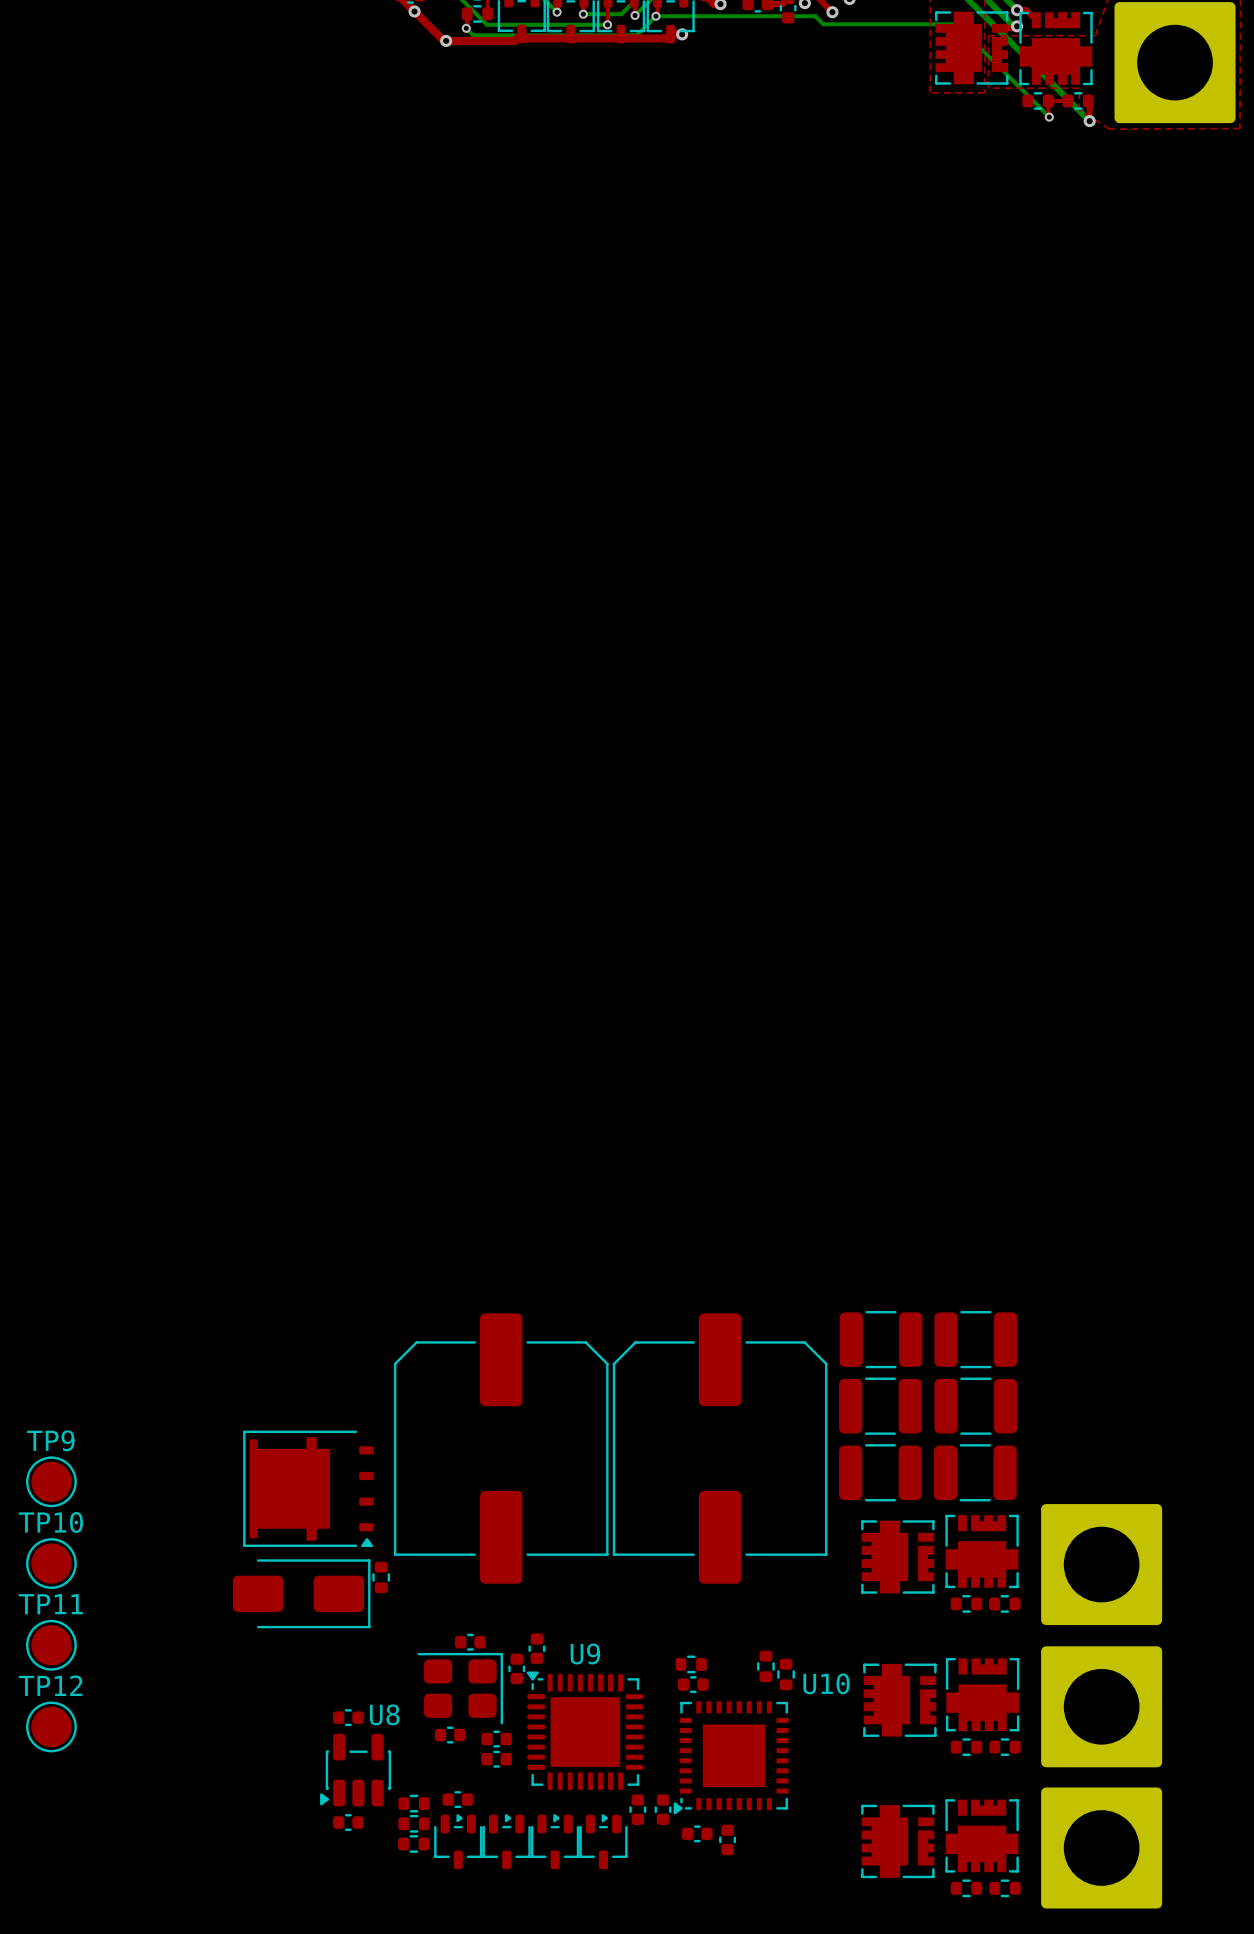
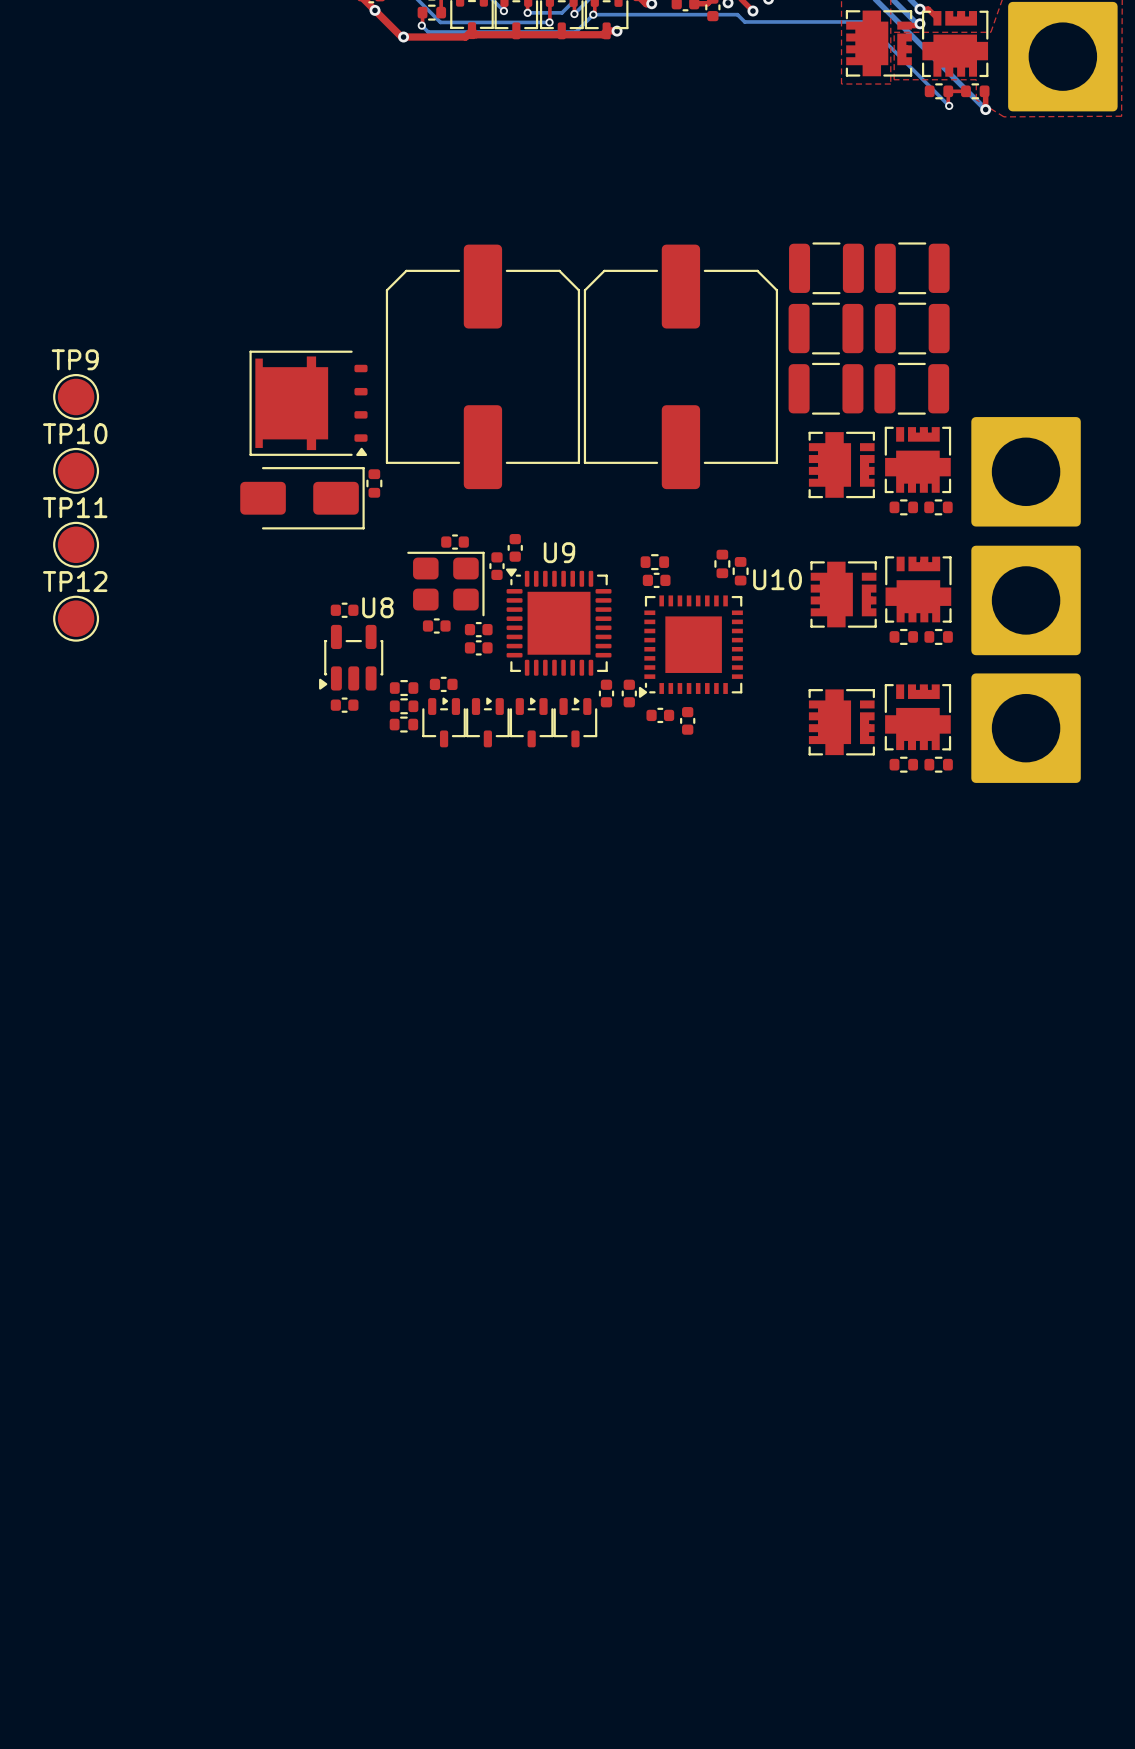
part: none -> (826, 268)
part: none -> (912, 268)
part: none -> (826, 328)
part: none -> (912, 328)
part: none -> (482, 366)
part: none -> (680, 366)
part: none -> (826, 388)
part: none -> (911, 388)
part: none -> (308, 403)
part: none -> (917, 459)
part: none -> (841, 464)
part: none -> (1026, 471)
part: none -> (374, 483)
part: none -> (302, 498)
part: none -> (903, 507)
part: none -> (938, 507)
part: none -> (455, 542)
part: none -> (515, 547)
part: none -> (654, 562)
part: none -> (722, 563)
part: none -> (496, 566)
part: none -> (740, 571)
part: none -> (656, 580)
part: none -> (445, 584)
part: none -> (918, 589)
part: none -> (843, 594)
part: none -> (1026, 600)
part: none -> (344, 610)
part: none -> (436, 625)
part: none -> (478, 629)
part: none -> (903, 636)
part: none -> (938, 636)
part: none -> (478, 647)
part: none -> (443, 684)
part: none -> (404, 688)
part: none -> (606, 693)
part: none -> (629, 693)
part: none -> (344, 705)
part: none -> (404, 706)
part: none -> (660, 715)
part: none -> (917, 717)
part: none -> (687, 720)
part: none -> (444, 722)
part: none -> (487, 722)
part: none -> (531, 722)
part: none -> (575, 722)
part: none -> (841, 722)
part: none -> (403, 724)
part: none -> (1026, 728)
part: none -> (903, 764)
part: none -> (938, 764)
part: (880, 1339) -> none
part: (975, 1339) -> none
part: (880, 1406) -> none
part: (975, 1406) -> none
part: (501, 1448) -> none
part: (720, 1448) -> none
part: (880, 1472) -> none
part: (975, 1472) -> none
TP9 position: (51, 1481) -> (76, 396)
part: (308, 1488) -> none
part: (982, 1551) -> none
part: (897, 1557) -> none
TP10 position: (51, 1563) -> (76, 470)
part: (1101, 1564) -> none
part: (381, 1577) -> none
part: (301, 1593) -> none
part: (966, 1603) -> none
part: (1004, 1603) -> none
part: (470, 1642) -> none
TP11 position: (51, 1645) -> (76, 544)
part: (536, 1648) -> none
part: (691, 1664) -> none
part: (765, 1666) -> none
part: (516, 1668) -> none
part: (786, 1674) -> none
part: (693, 1684) -> none
part: (460, 1688) -> none
part: (982, 1694) -> none
part: (899, 1700) -> none
part: (1101, 1706) -> none
part: (348, 1717) -> none
TP12 position: (51, 1726) -> (76, 618)
U9 position: (584, 1730) -> (558, 622)
part: (450, 1735) -> none
part: (496, 1739) -> none
part: (966, 1747) -> none
part: (1005, 1747) -> none
U10 position: (731, 1757) -> (690, 646)
part: (496, 1759) -> none
U8 position: (355, 1770) -> (351, 657)
part: (457, 1799) -> none
part: (414, 1803) -> none
part: (637, 1809) -> none
part: (663, 1809) -> none
part: (348, 1822) -> none
part: (414, 1823) -> none
part: (697, 1833) -> none
part: (982, 1835) -> none
part: (727, 1839) -> none
part: (458, 1841) -> none
part: (506, 1841) -> none
part: (555, 1841) -> none
part: (603, 1841) -> none
part: (897, 1841) -> none
part: (413, 1843) -> none
part: (1101, 1848) -> none
part: (966, 1888) -> none
part: (1005, 1888) -> none

